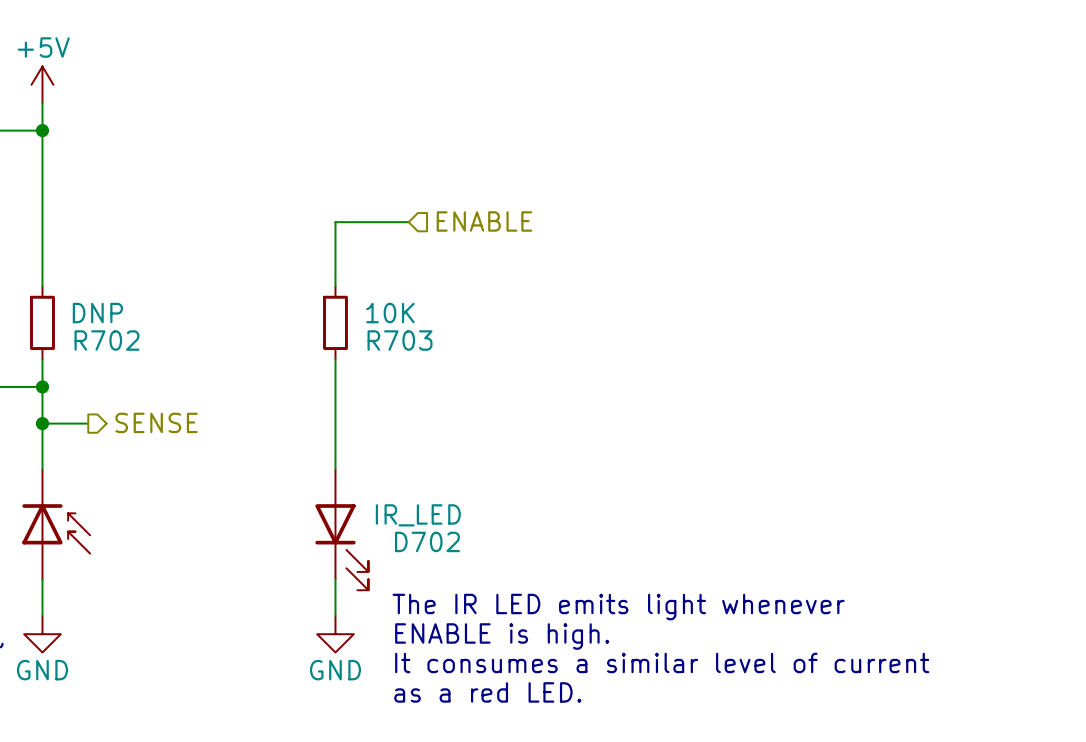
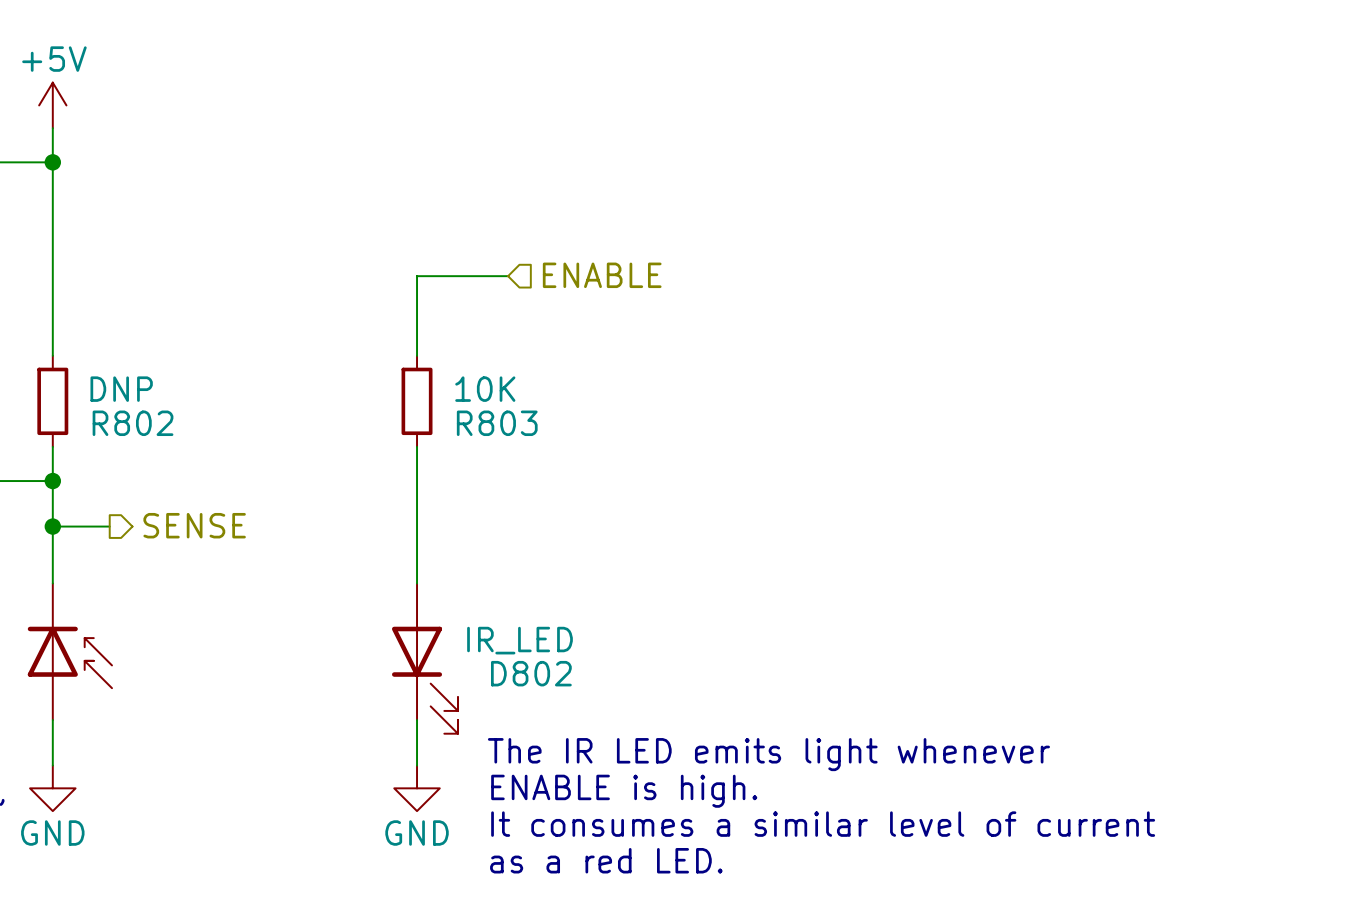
R702 name: R702 (107, 340) -> R802 (133, 423)
R703 name: R703 (400, 340) -> R803 (497, 423)
D702 name: D702 (427, 541) -> D802 (531, 673)

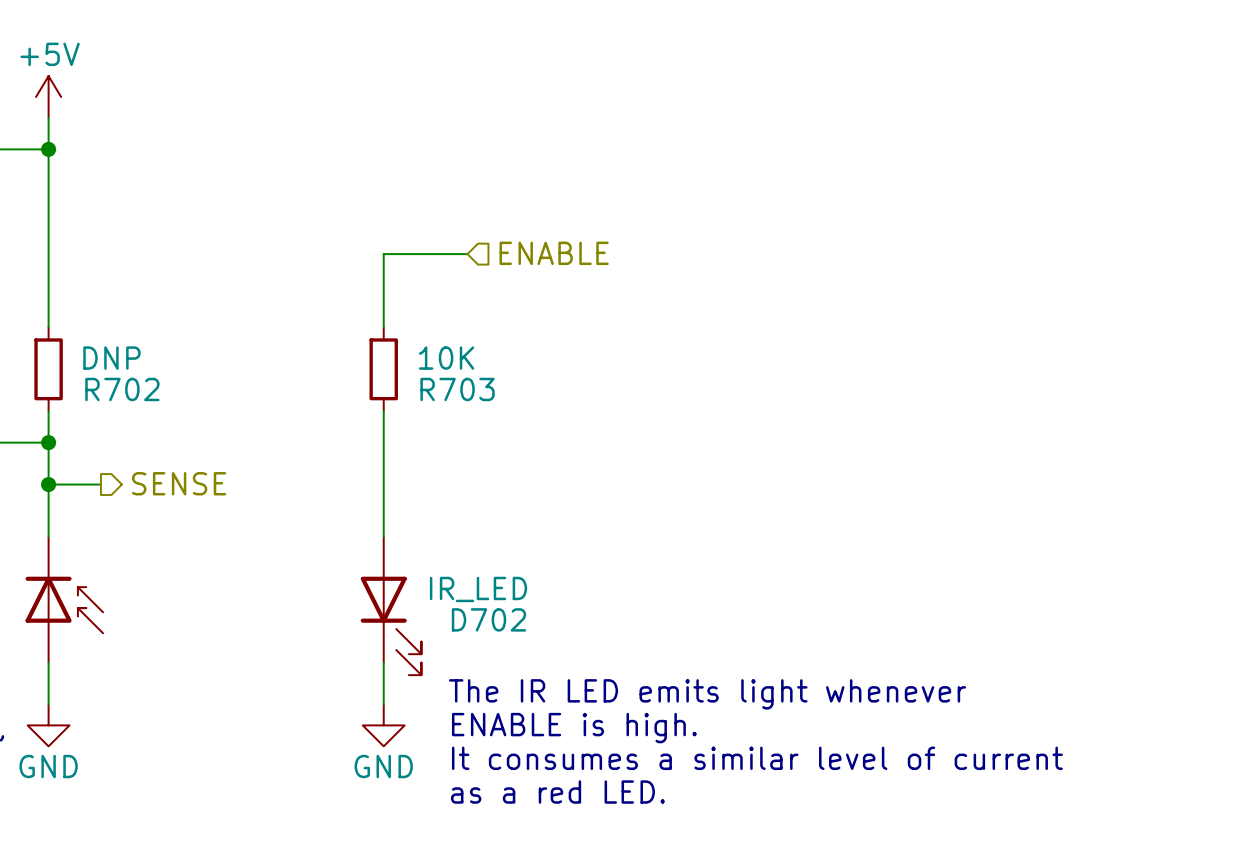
R802 name: R802 (133, 423) -> R702 (122, 389)
R803 name: R803 (497, 423) -> R703 (457, 389)
D802 name: D802 (531, 673) -> D702 (488, 619)

